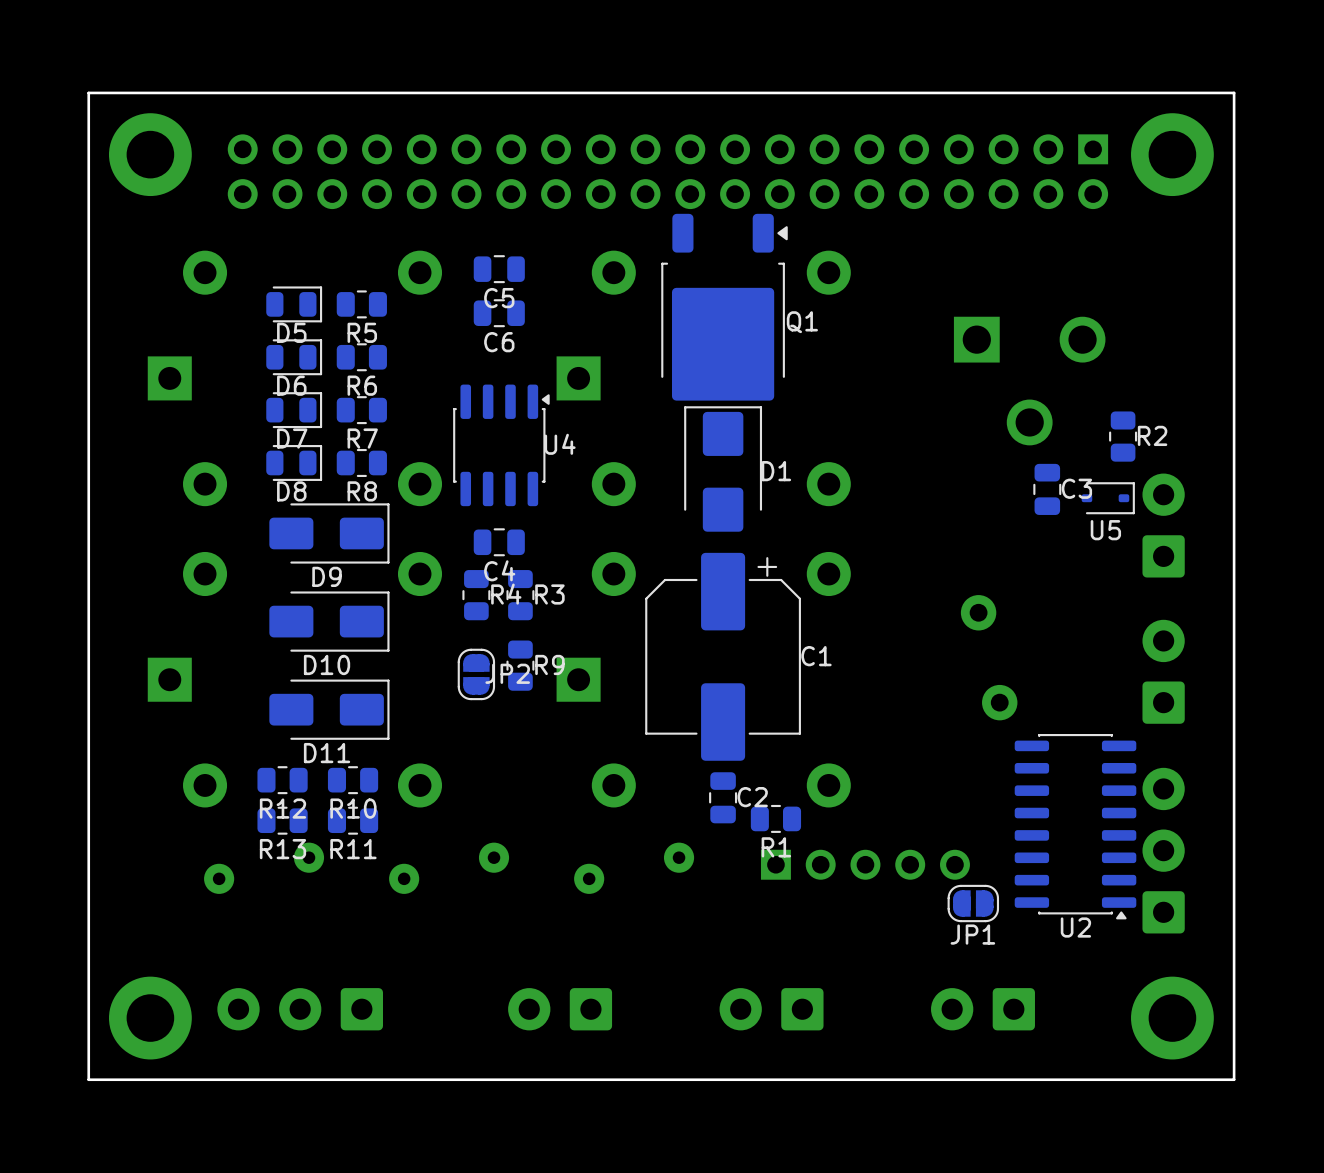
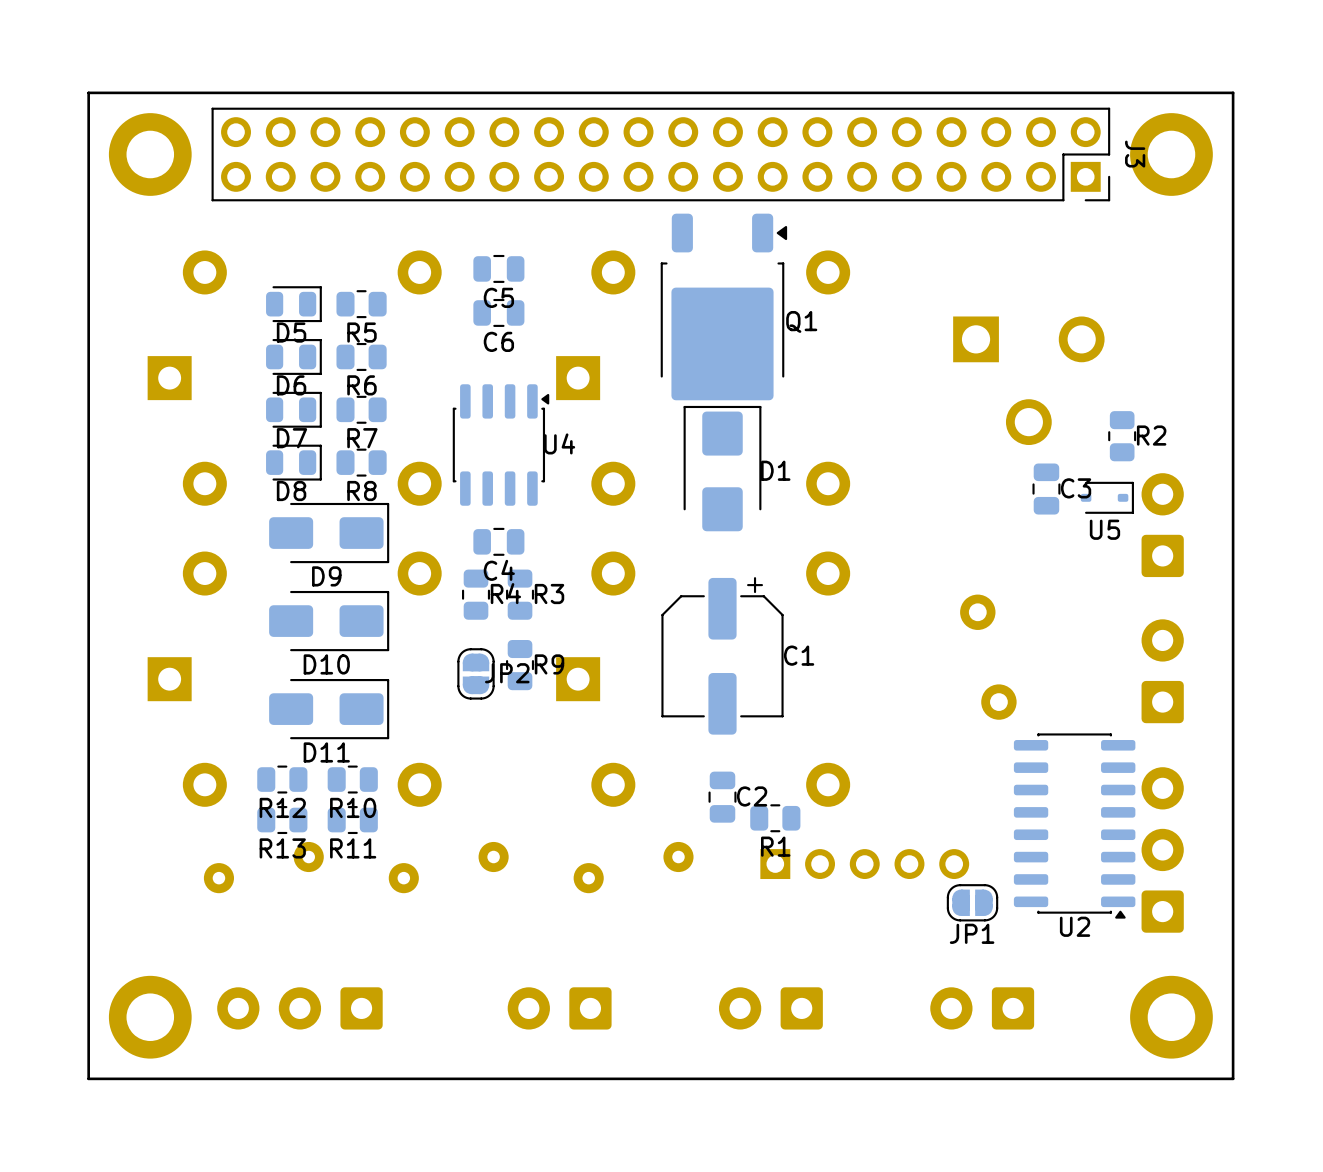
J3: none -> (660, 154)
part: (667, 171) -> none
C1 footprint: [645, 552, 801, 761] -> [661, 577, 784, 735]

